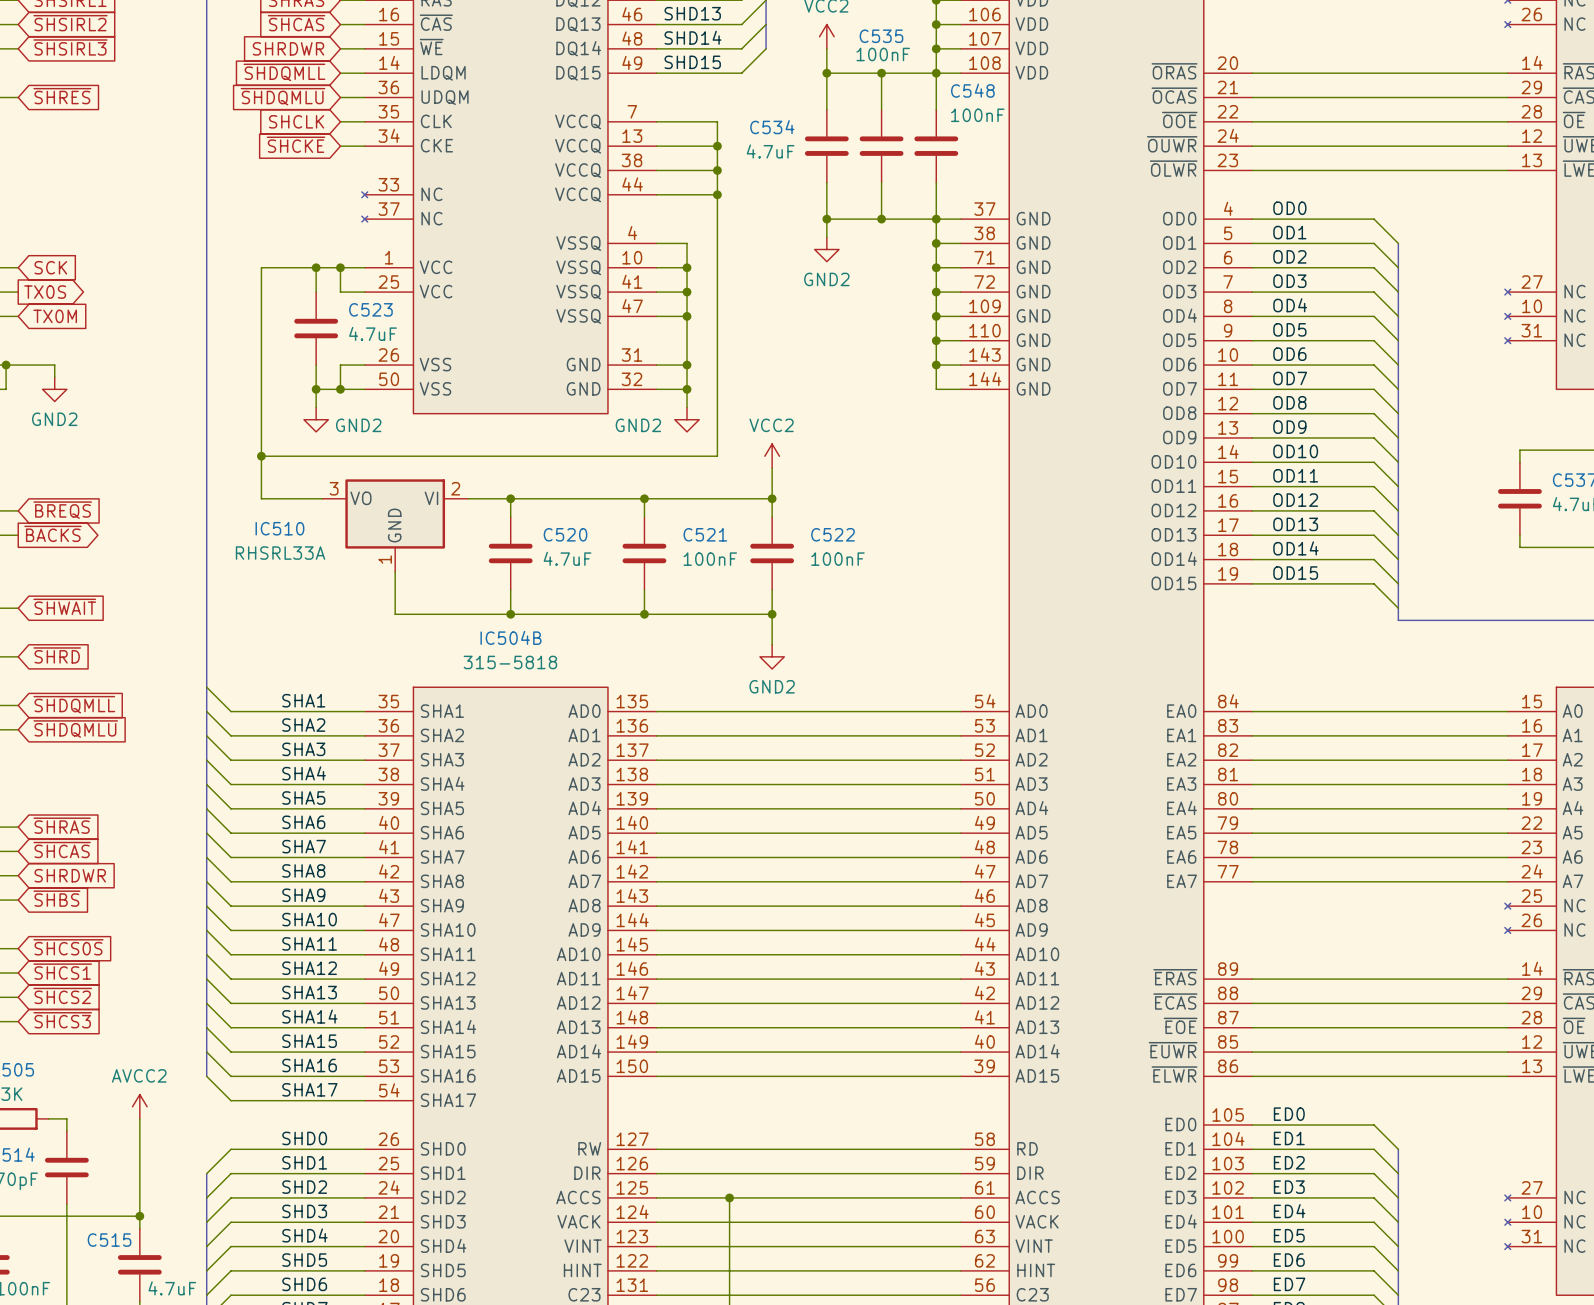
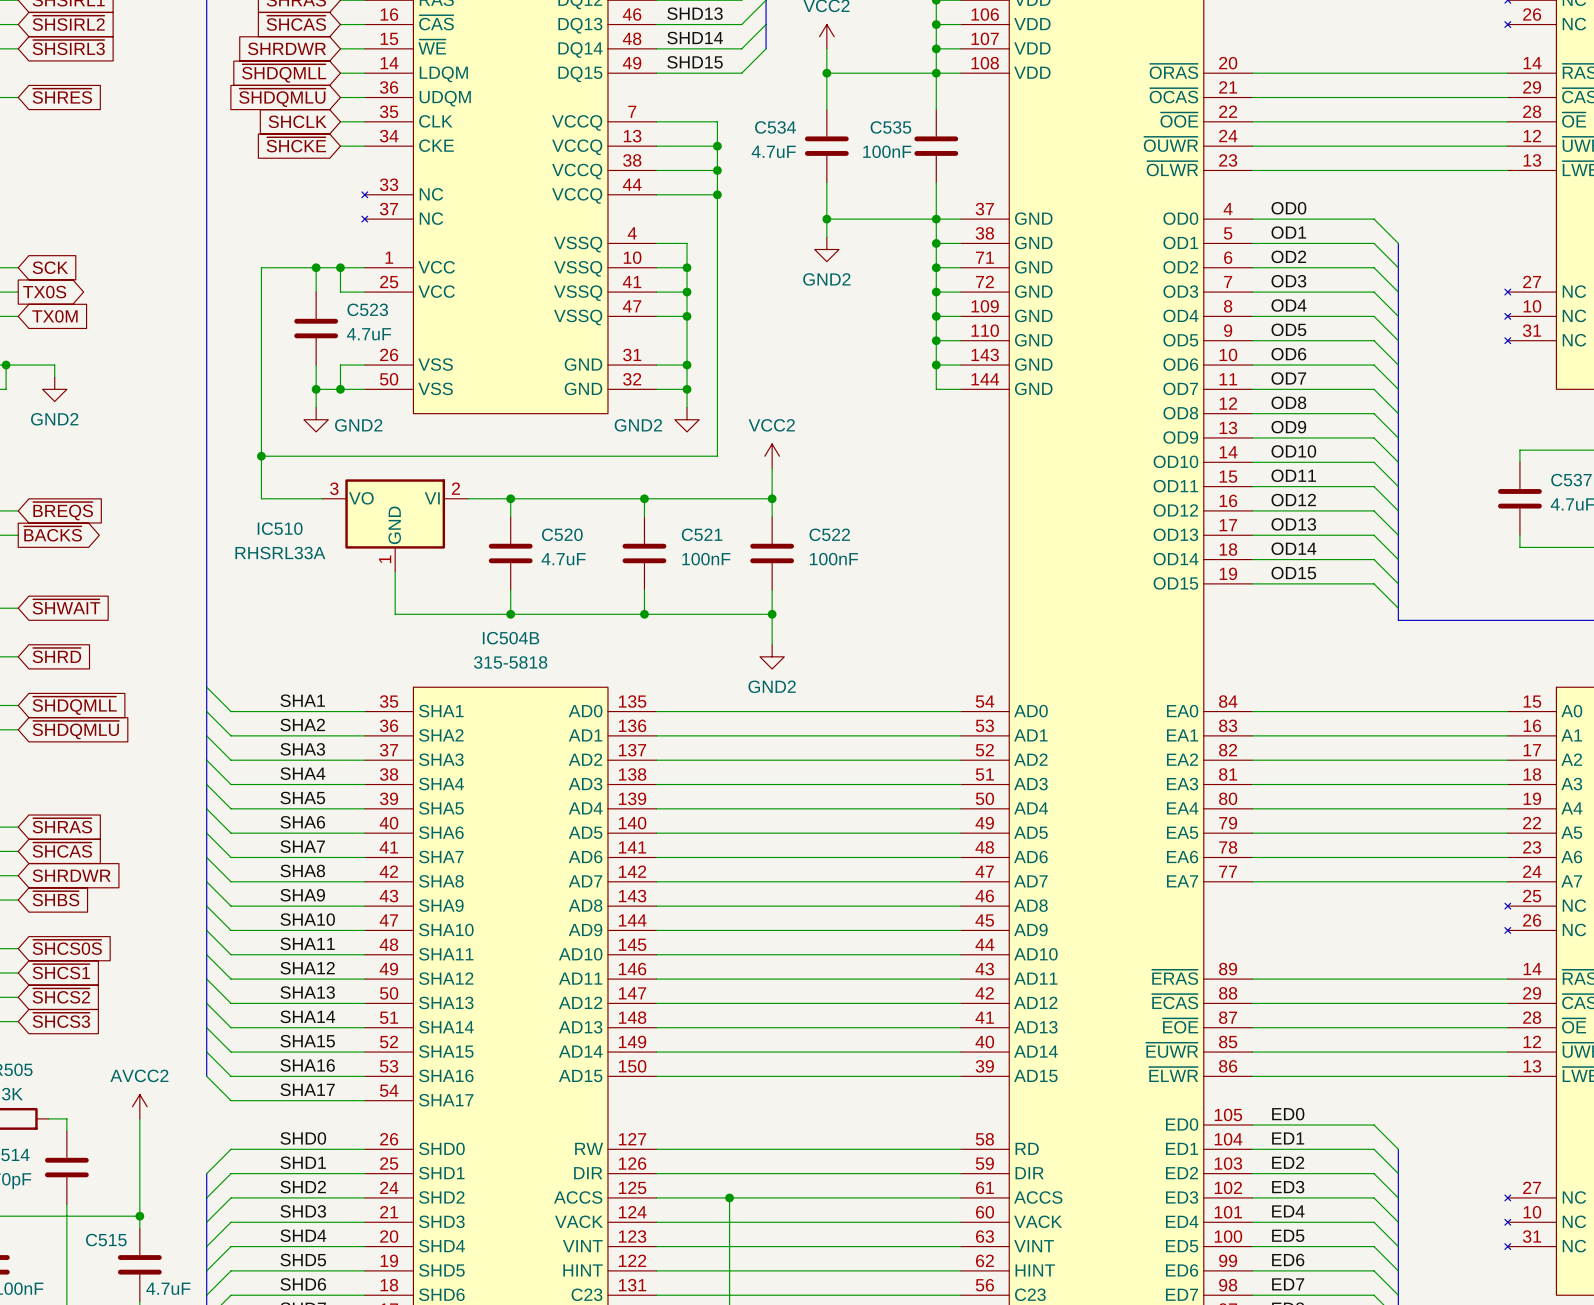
wire: (881, 73) (881, 109) -> none
junction: (881, 73) -> none
C548 name: C548 (972, 90) -> C535 (890, 127)
C548 value position: 100nF (977, 115) -> 100nF (887, 151)
C535: 100nF (881, 146) -> none
wire: (881, 182) (881, 219) -> none
junction: (881, 219) -> none

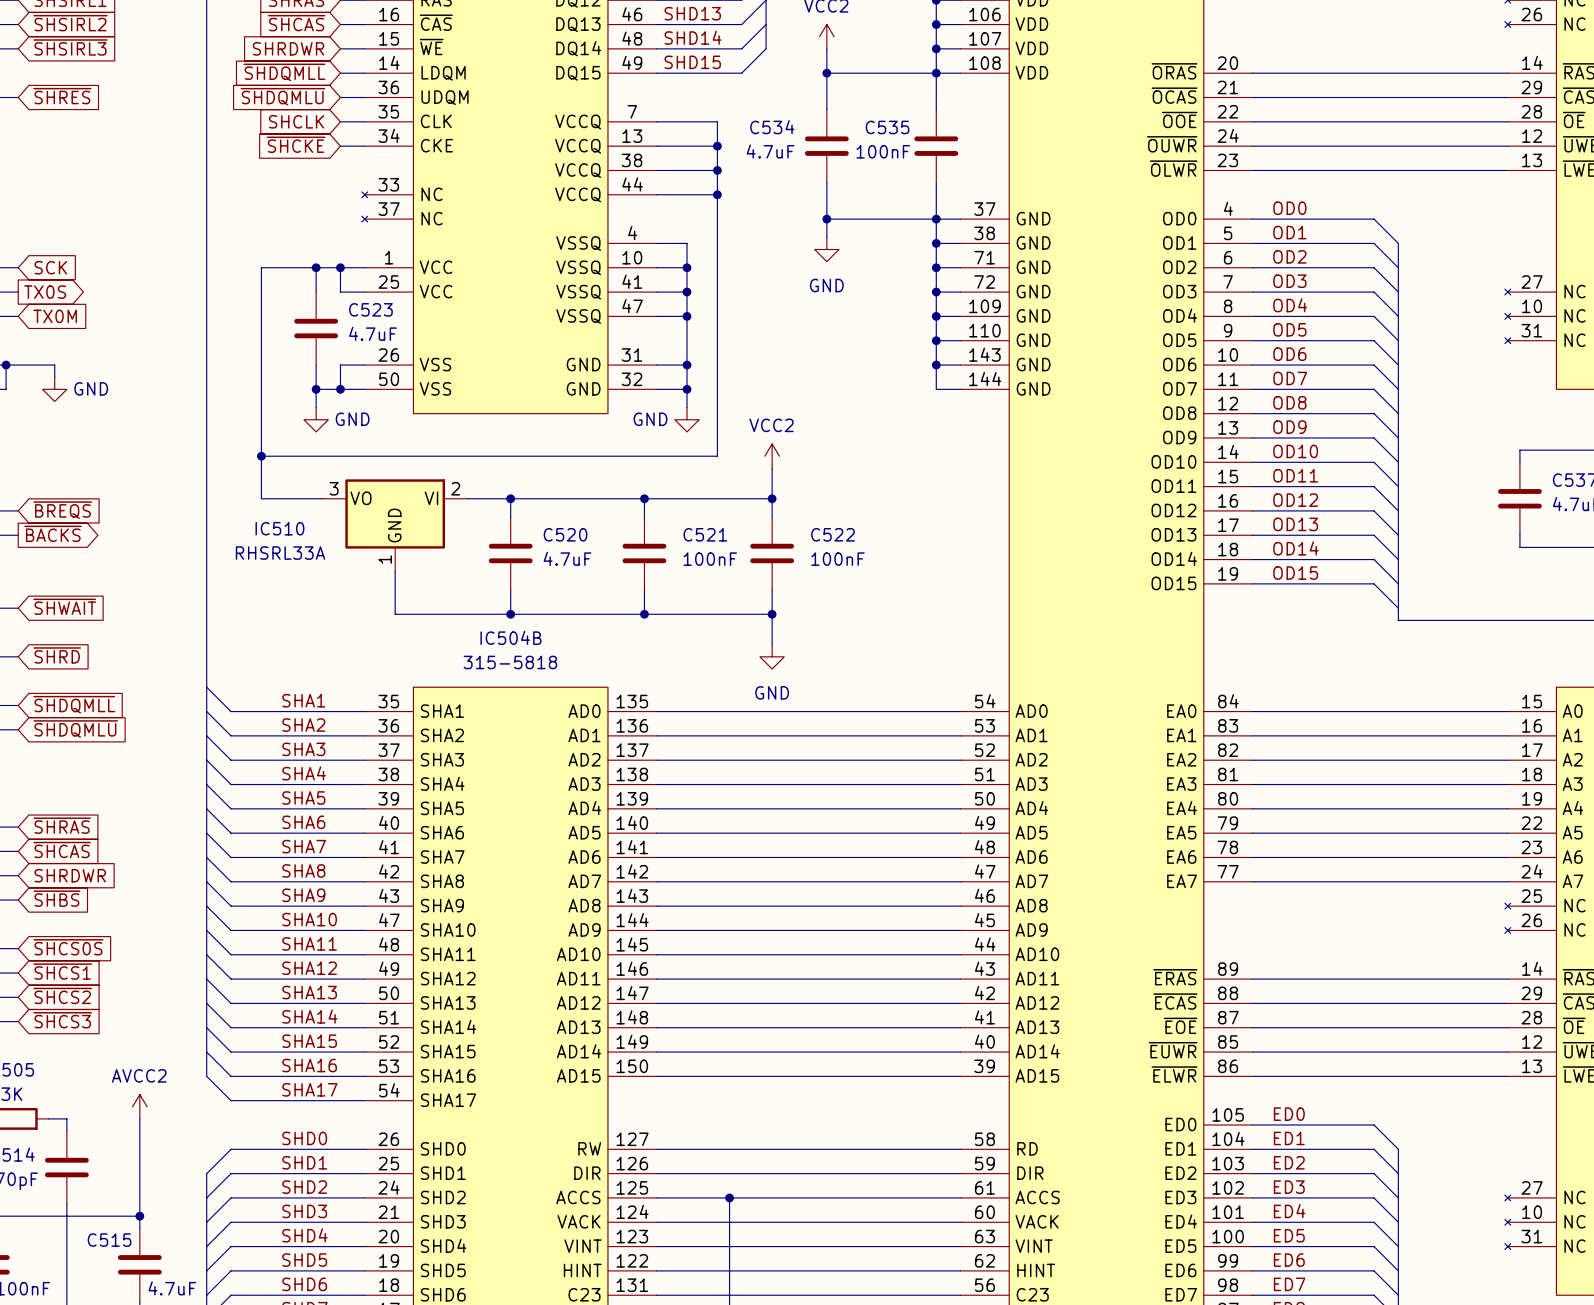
power symbol: GND2 (826, 249) -> GND (826, 249)
power symbol: GND2 (54, 389) -> GND (54, 389)
power symbol: GND2 (316, 419) -> GND (316, 419)
power symbol: GND2 (687, 419) -> GND (687, 419)
power symbol: GND2 (772, 656) -> GND (772, 656)

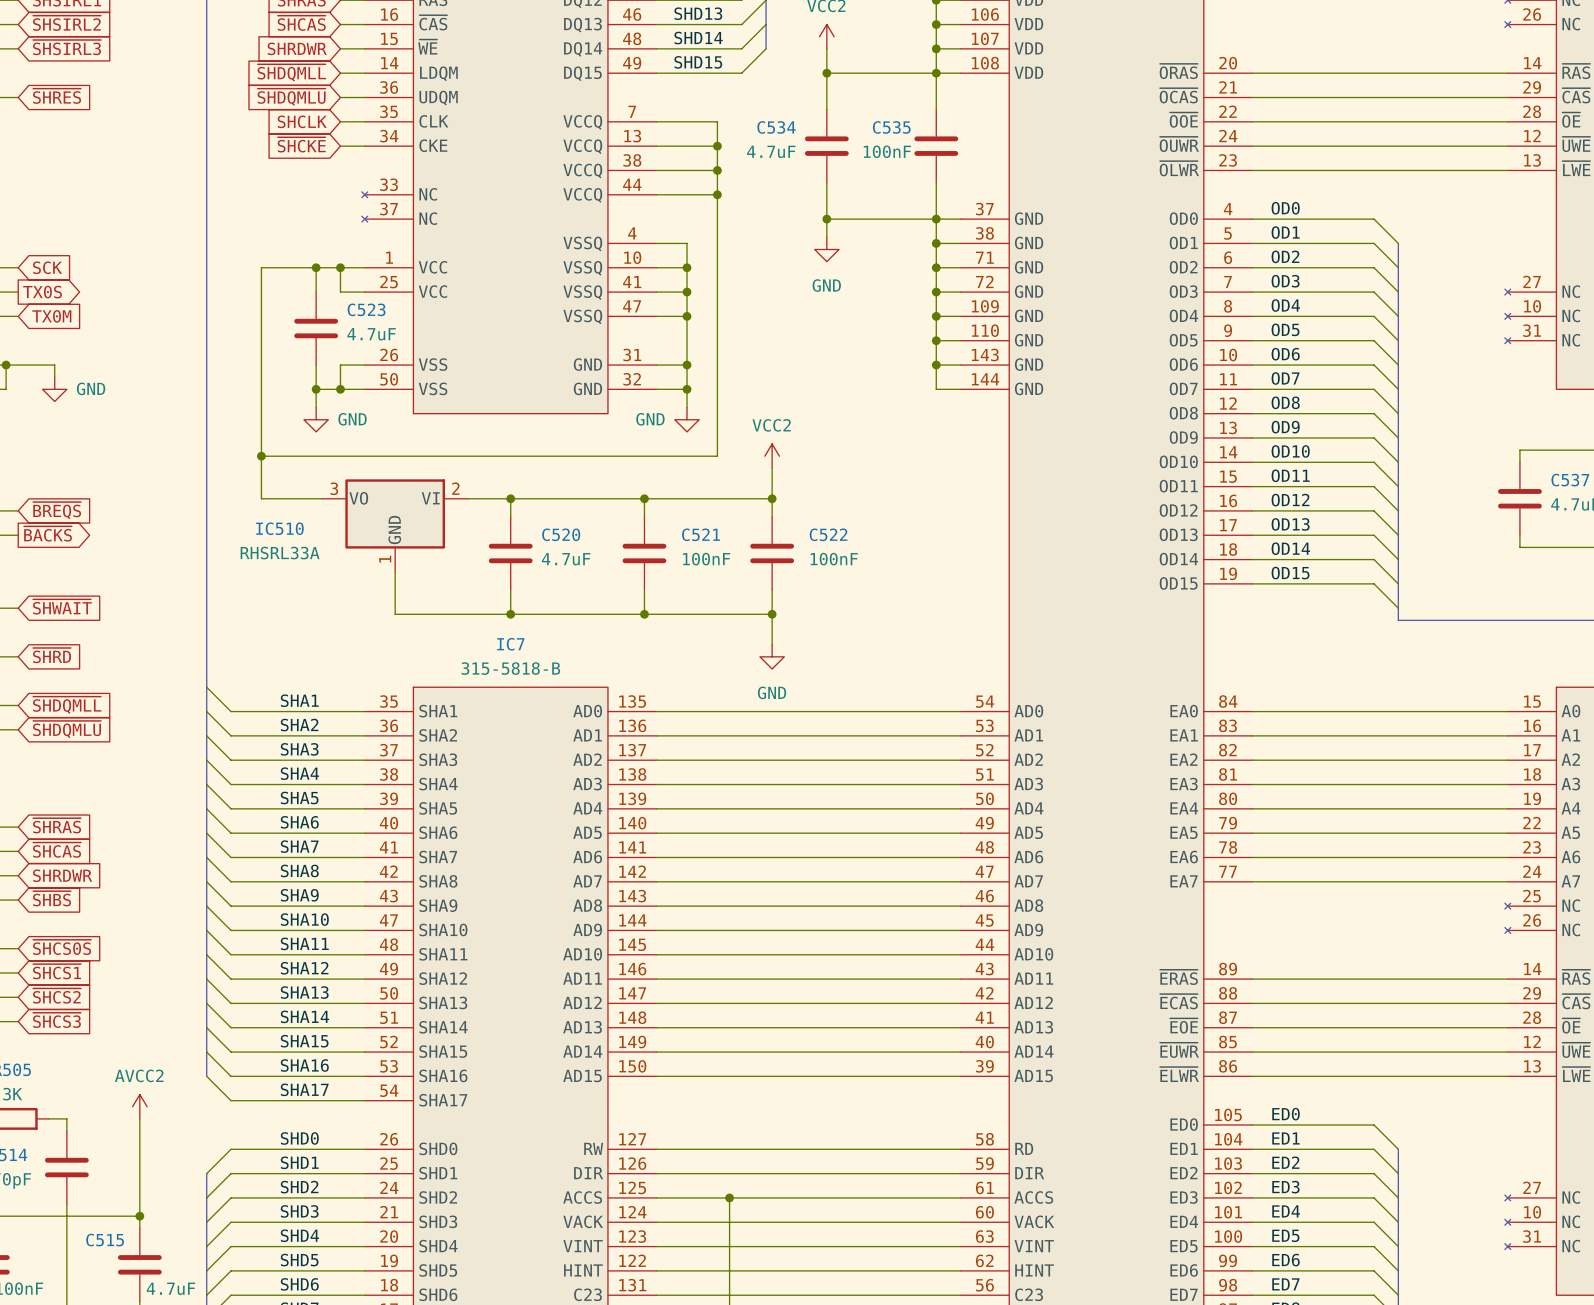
IC504B name: IC504B (510, 637) -> IC7 (510, 644)
IC504B value: 315-5818 (510, 662) -> 315-5818-B (510, 668)

